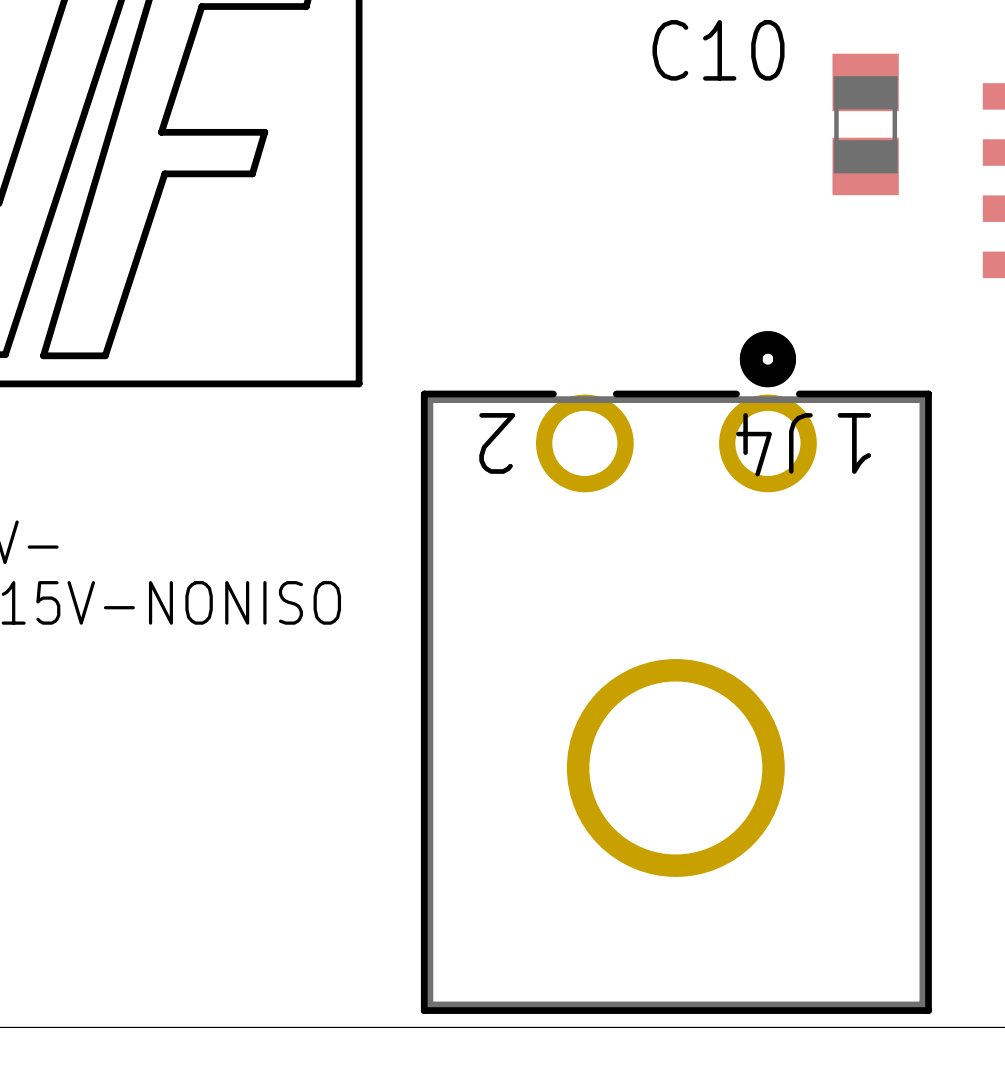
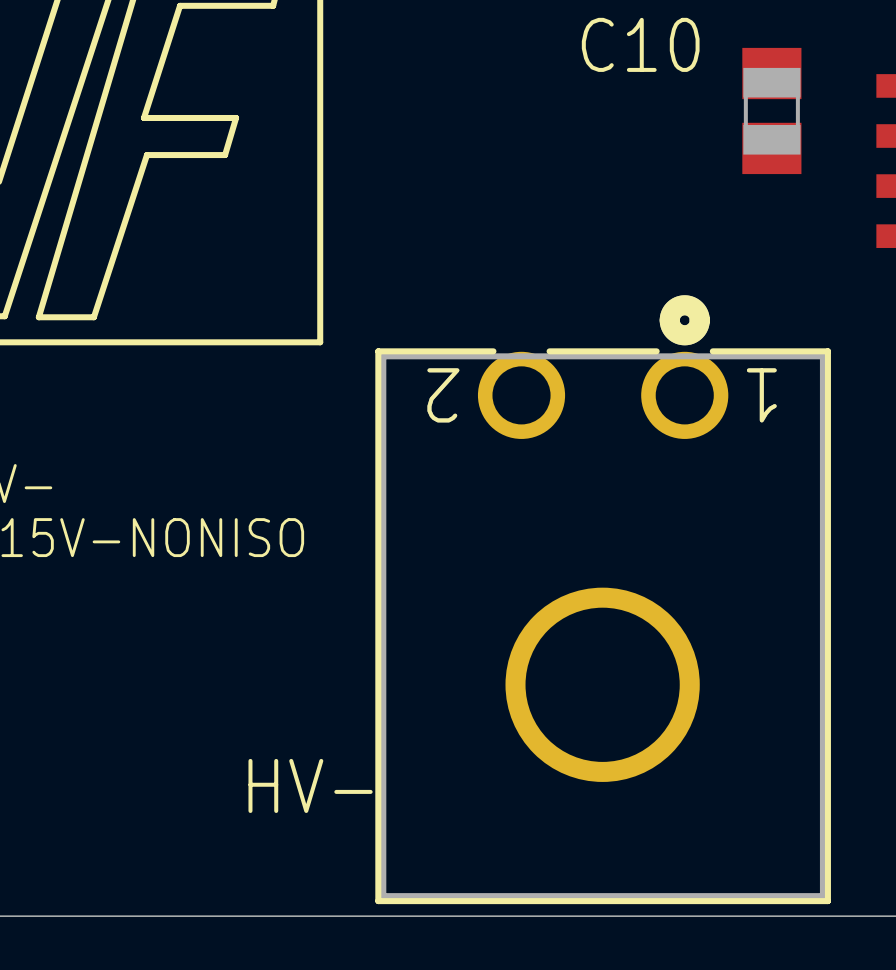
J4 name: J4 (774, 444) -> HV- (310, 785)

